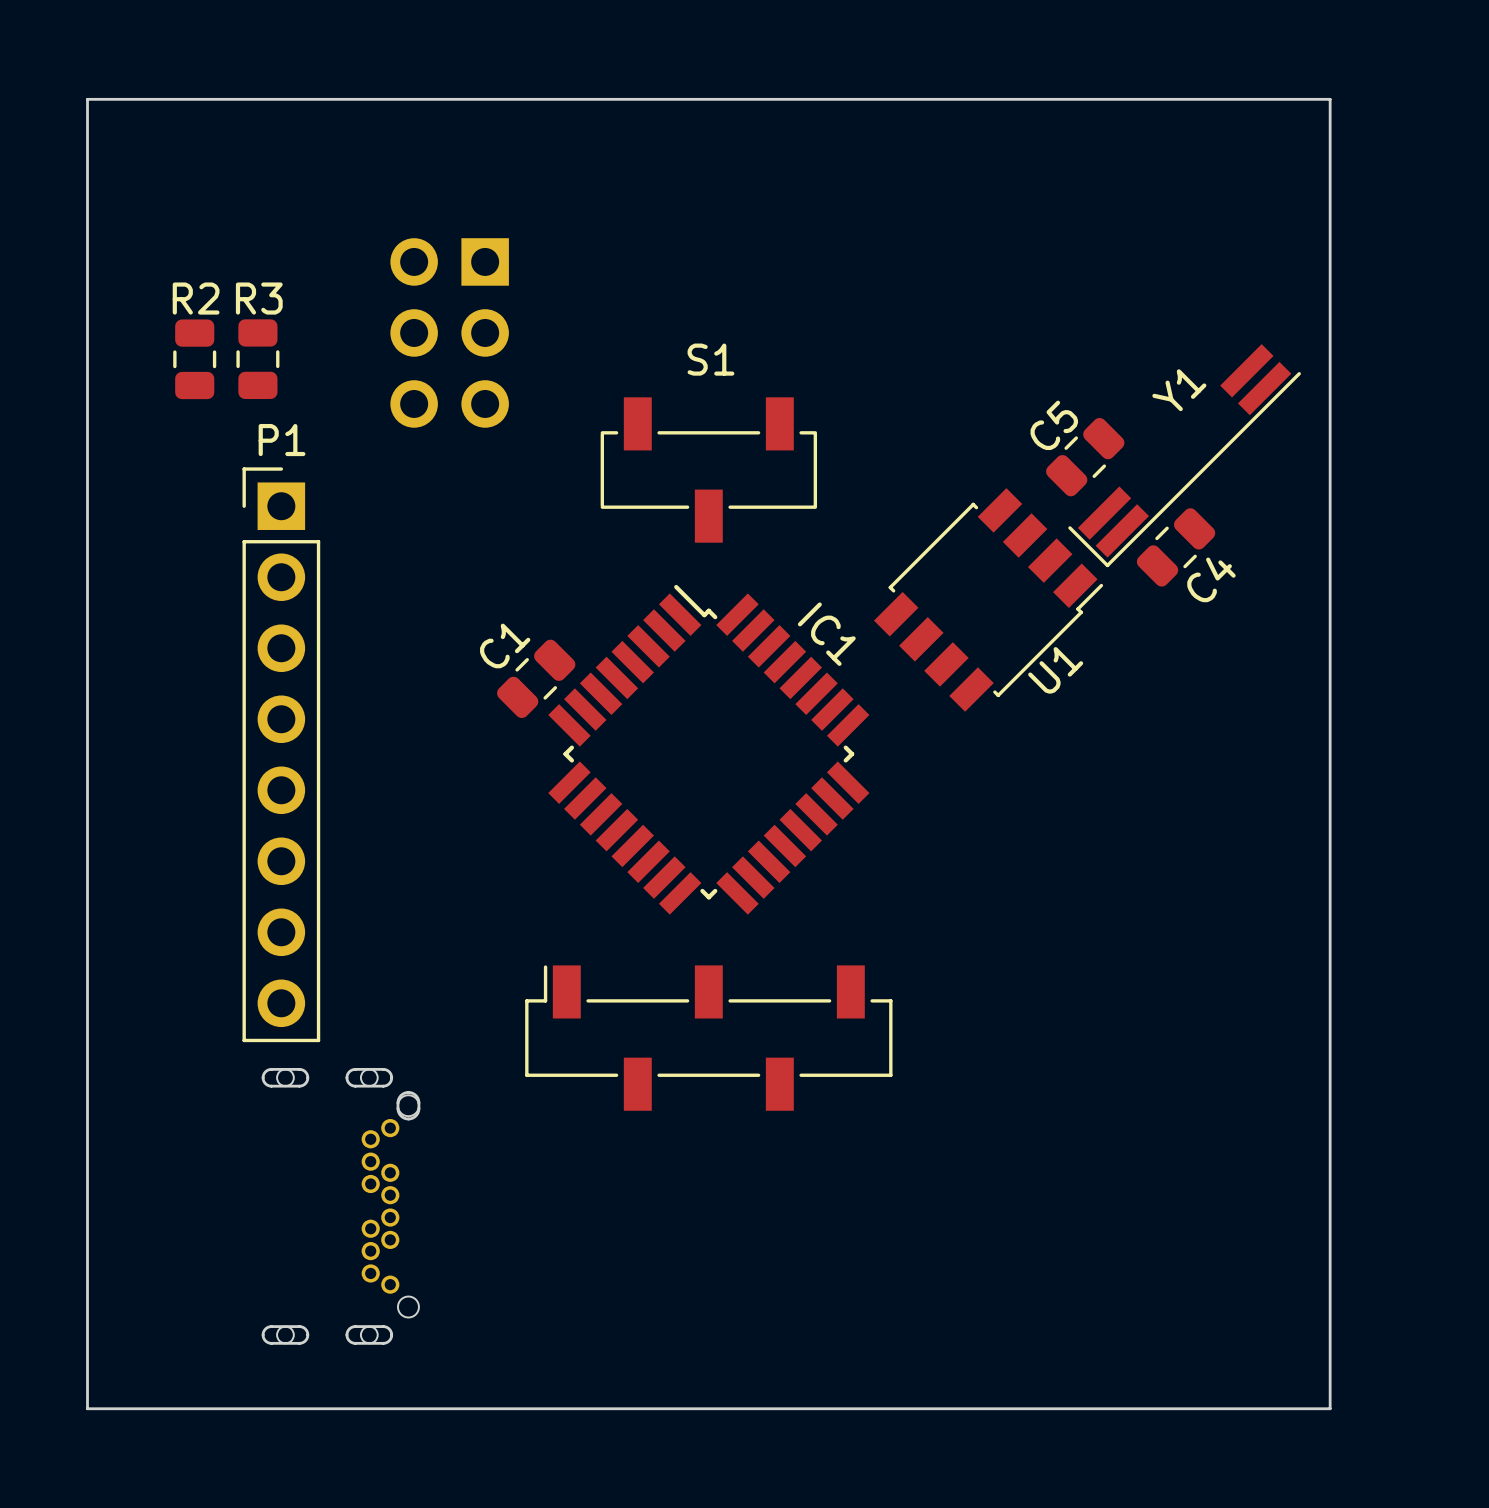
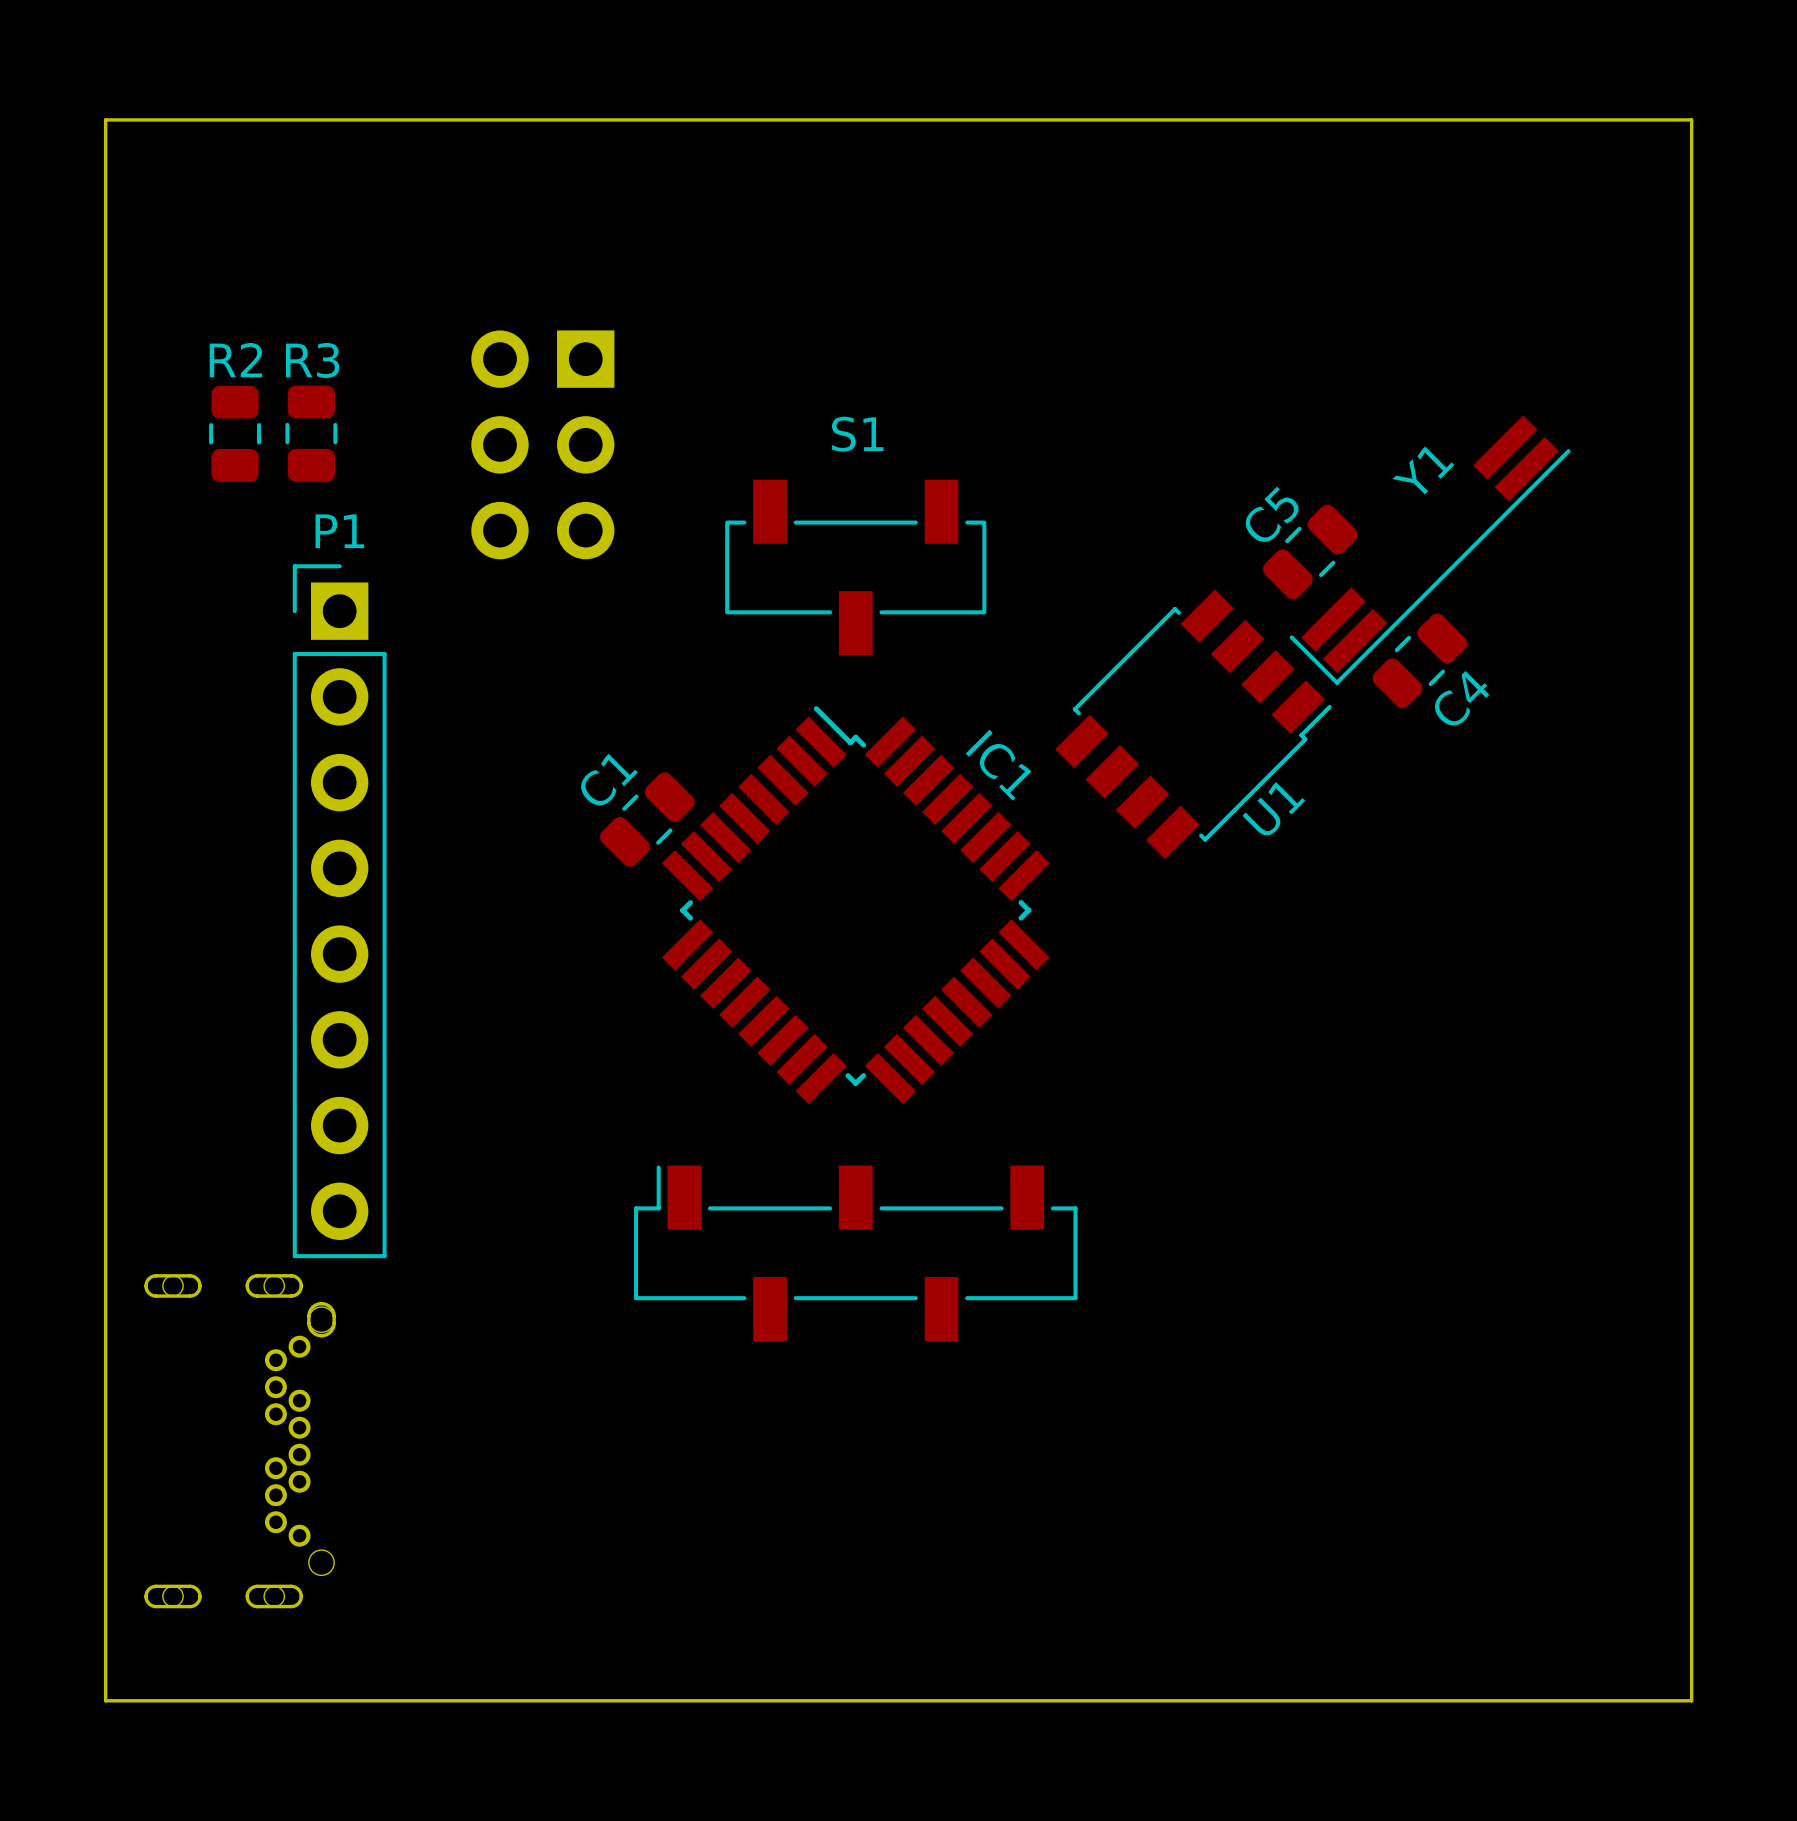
board edge: (1330, 99) (1330, 1408) -> (1605, 119) (1691, 119) (1691, 1700) (1605, 1700)
part position: (449, 332) -> (542, 444)
part position: (341, 1206) -> (240, 1441)

